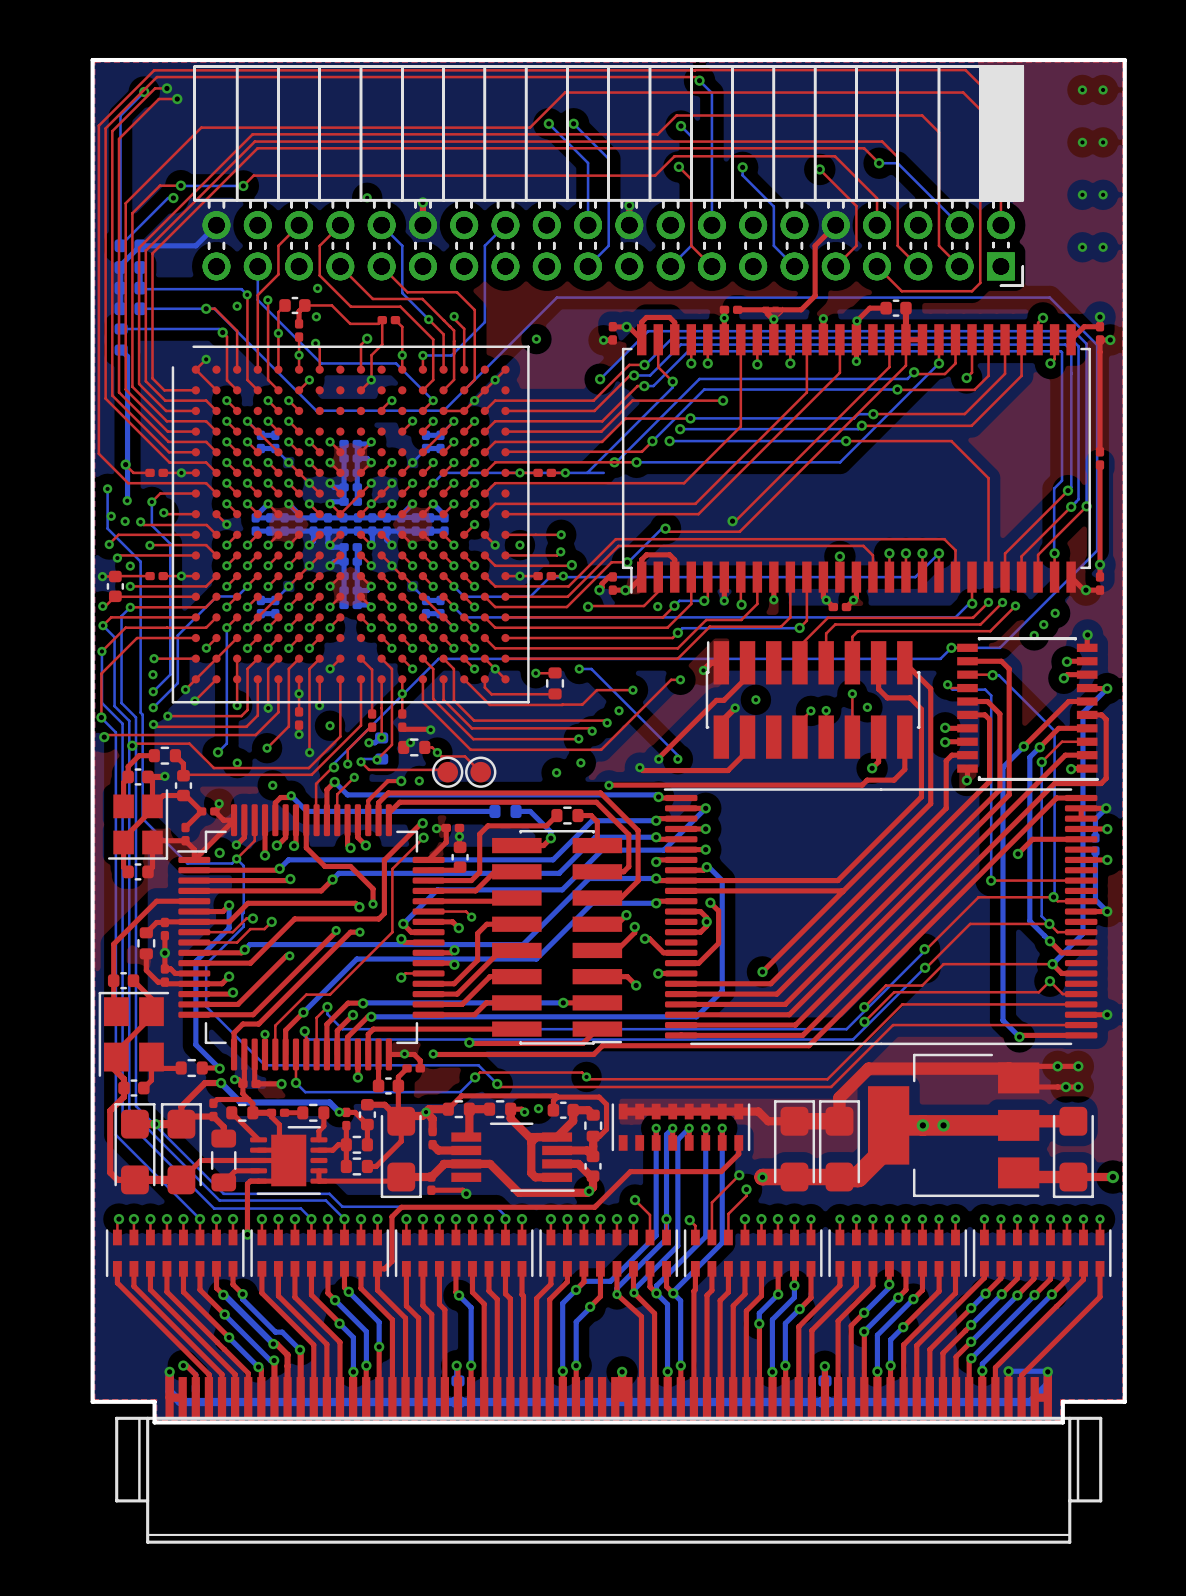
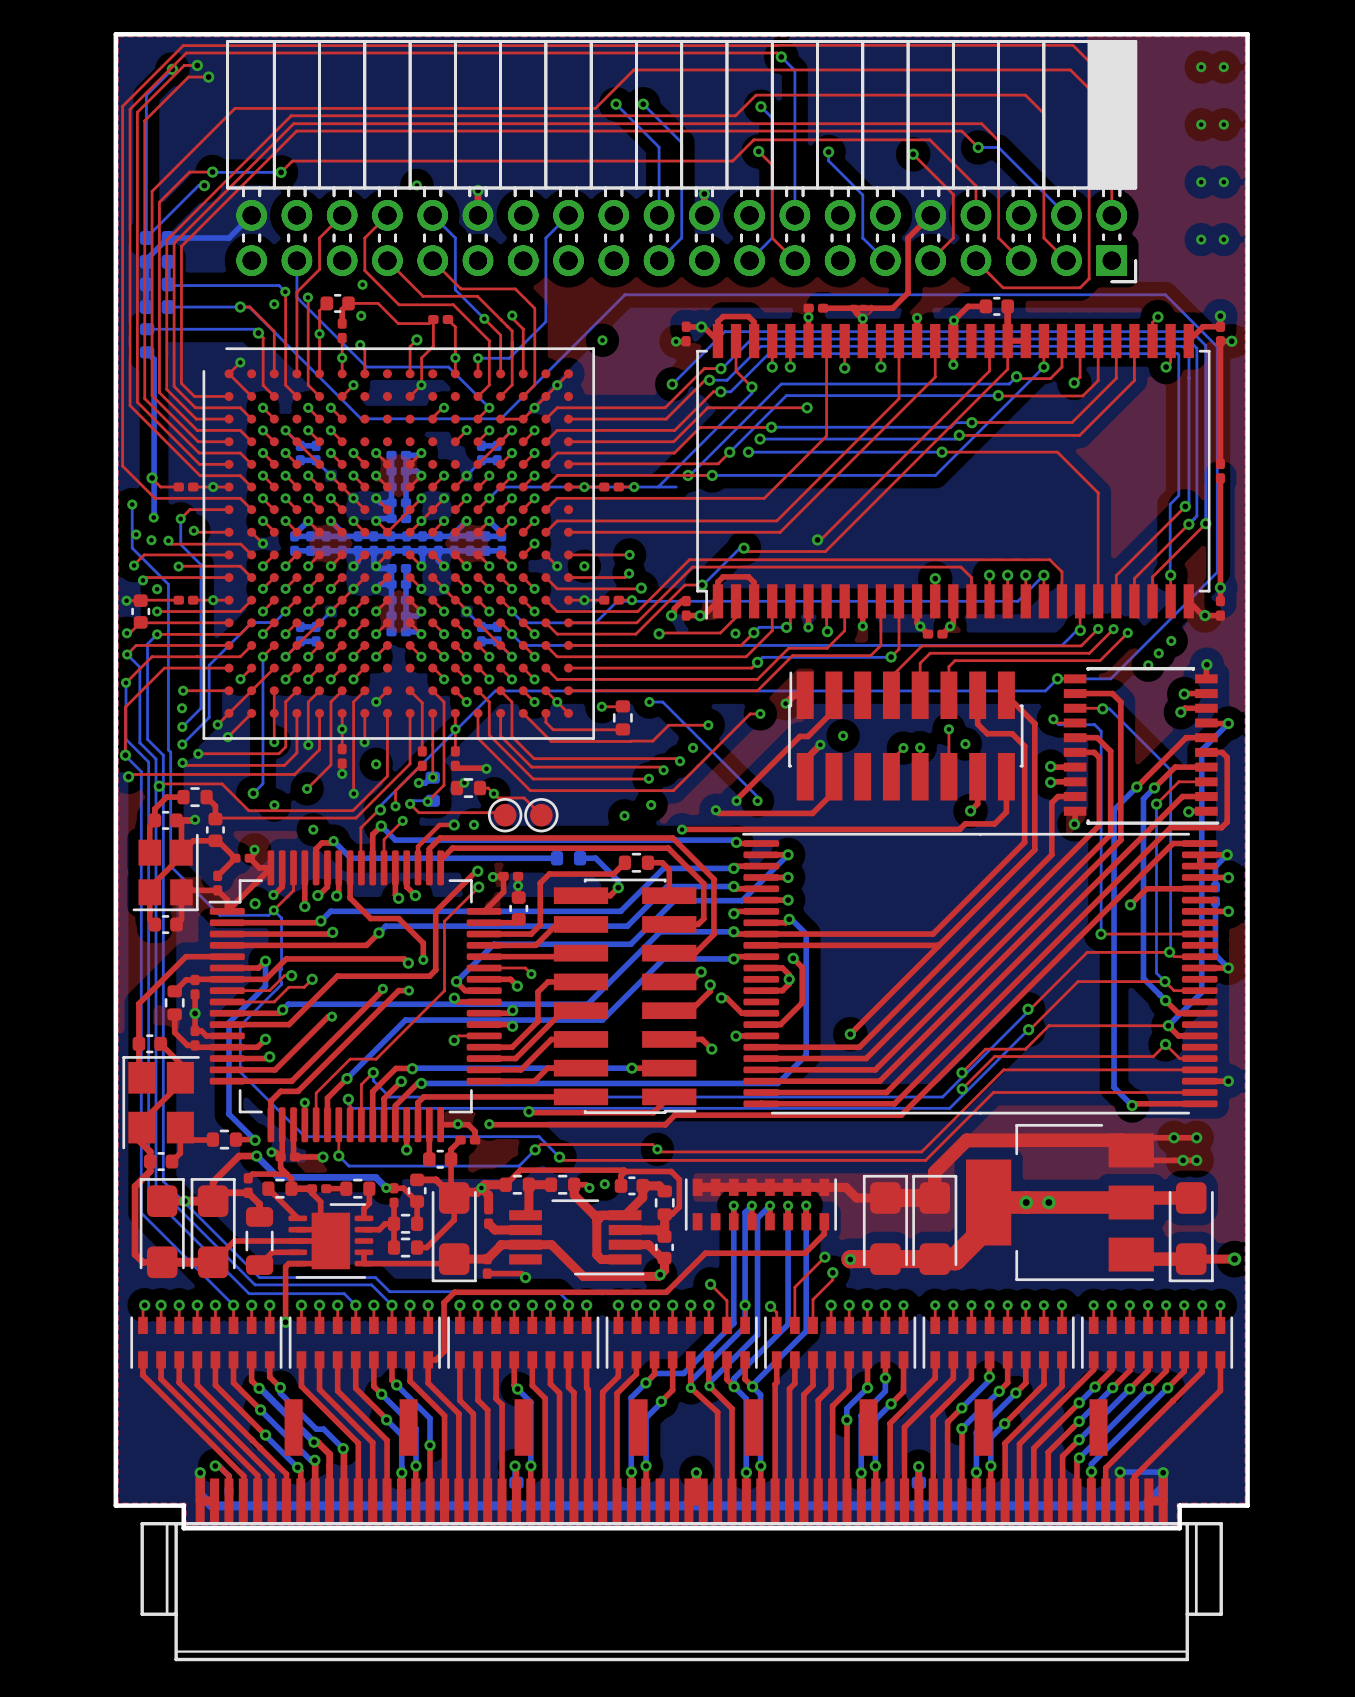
part: none -> (681, 1530)

